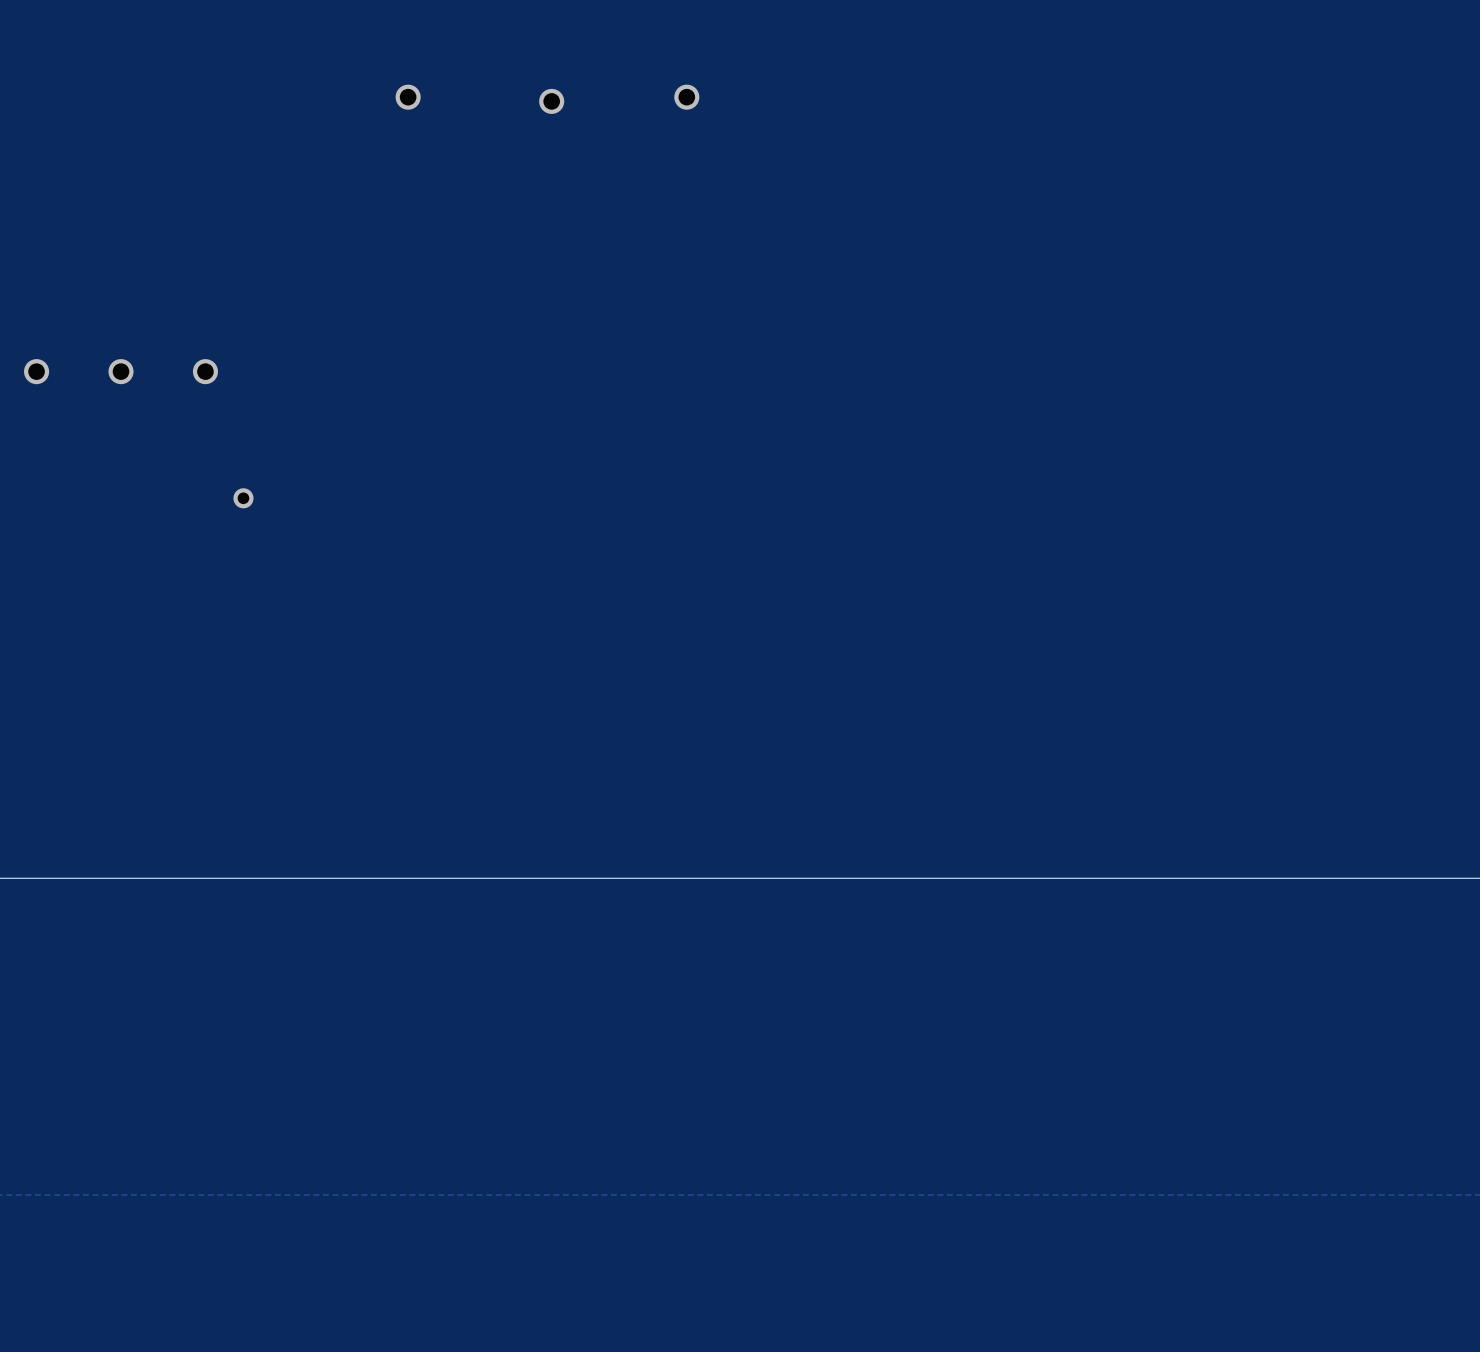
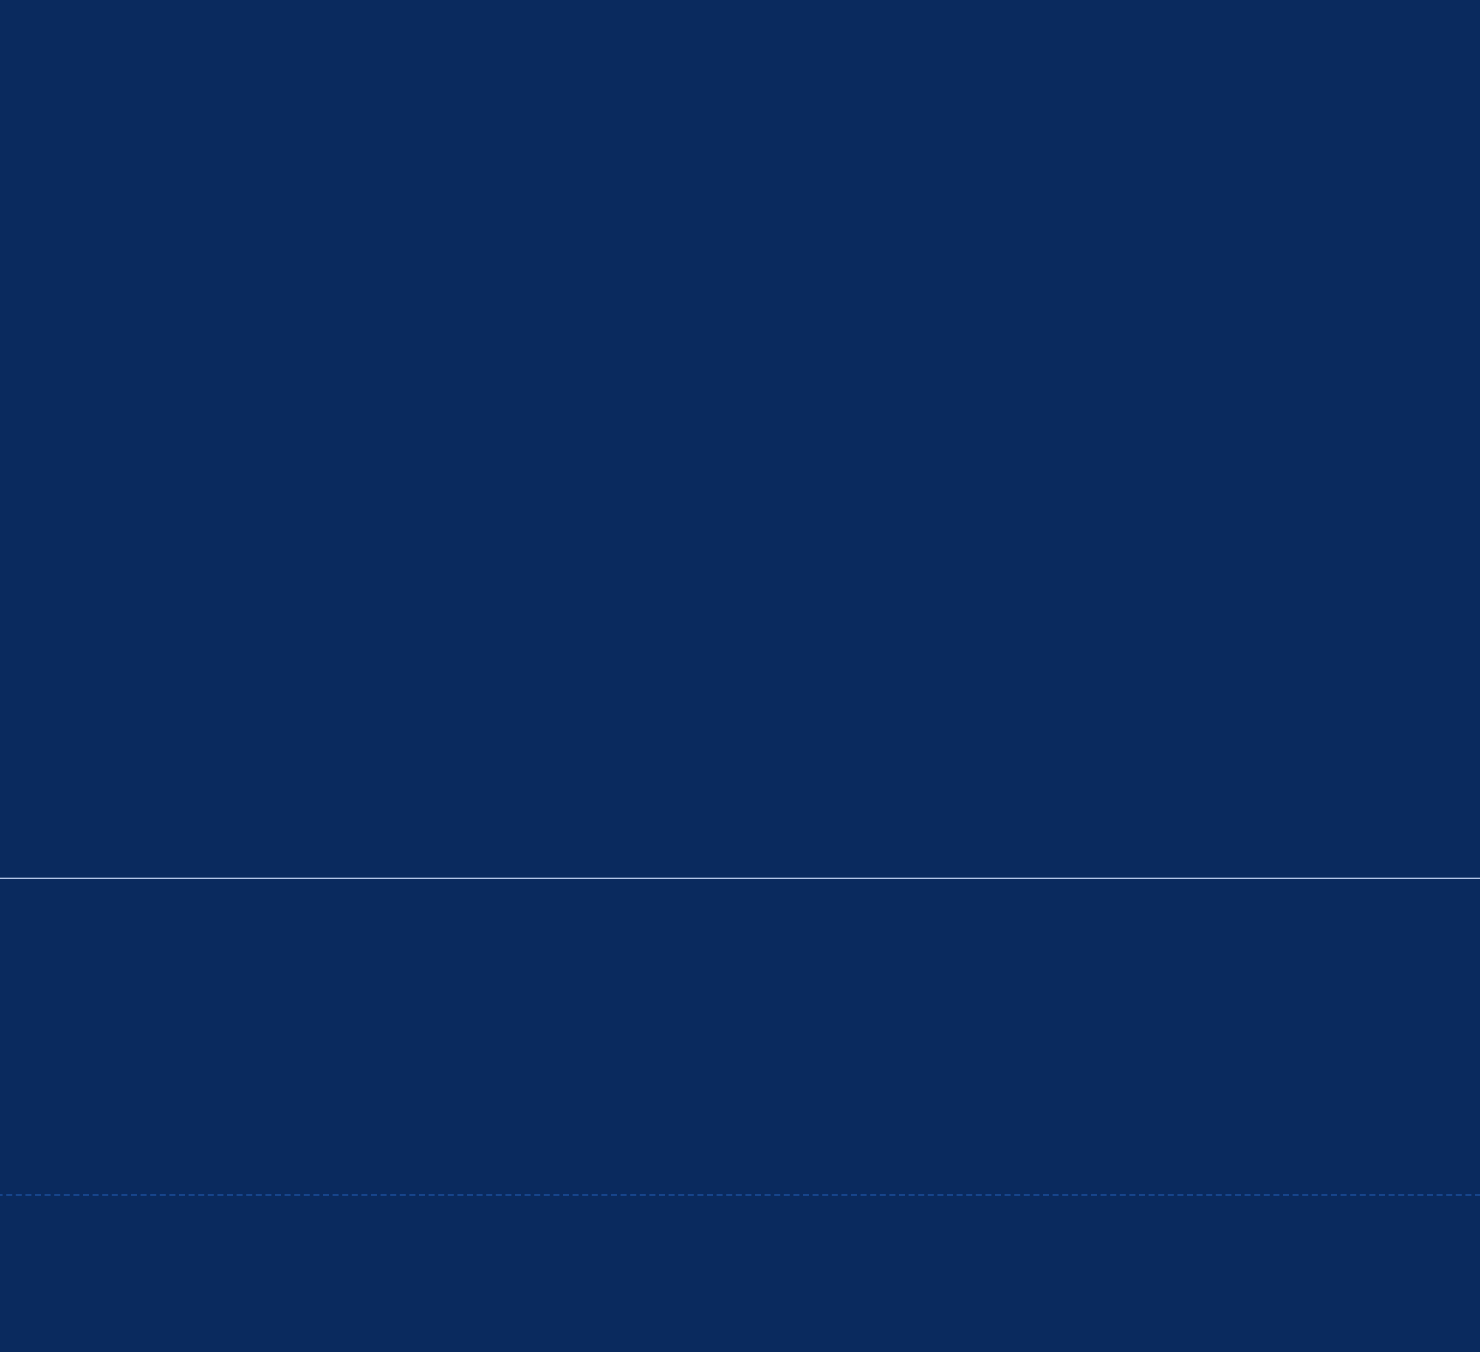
via: (408, 97) -> none
via: (686, 97) -> none
via: (551, 101) -> none
via: (36, 371) -> none
via: (121, 371) -> none
via: (205, 371) -> none
via: (243, 498) -> none

